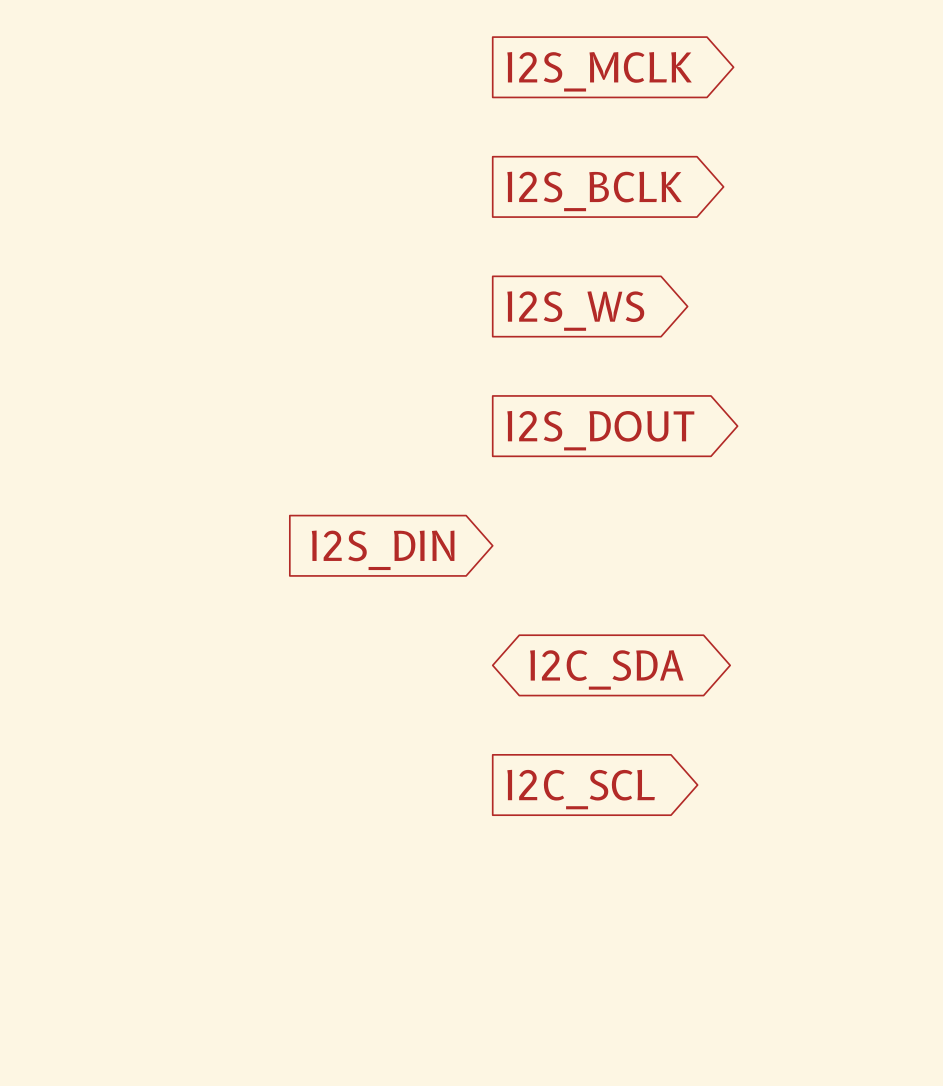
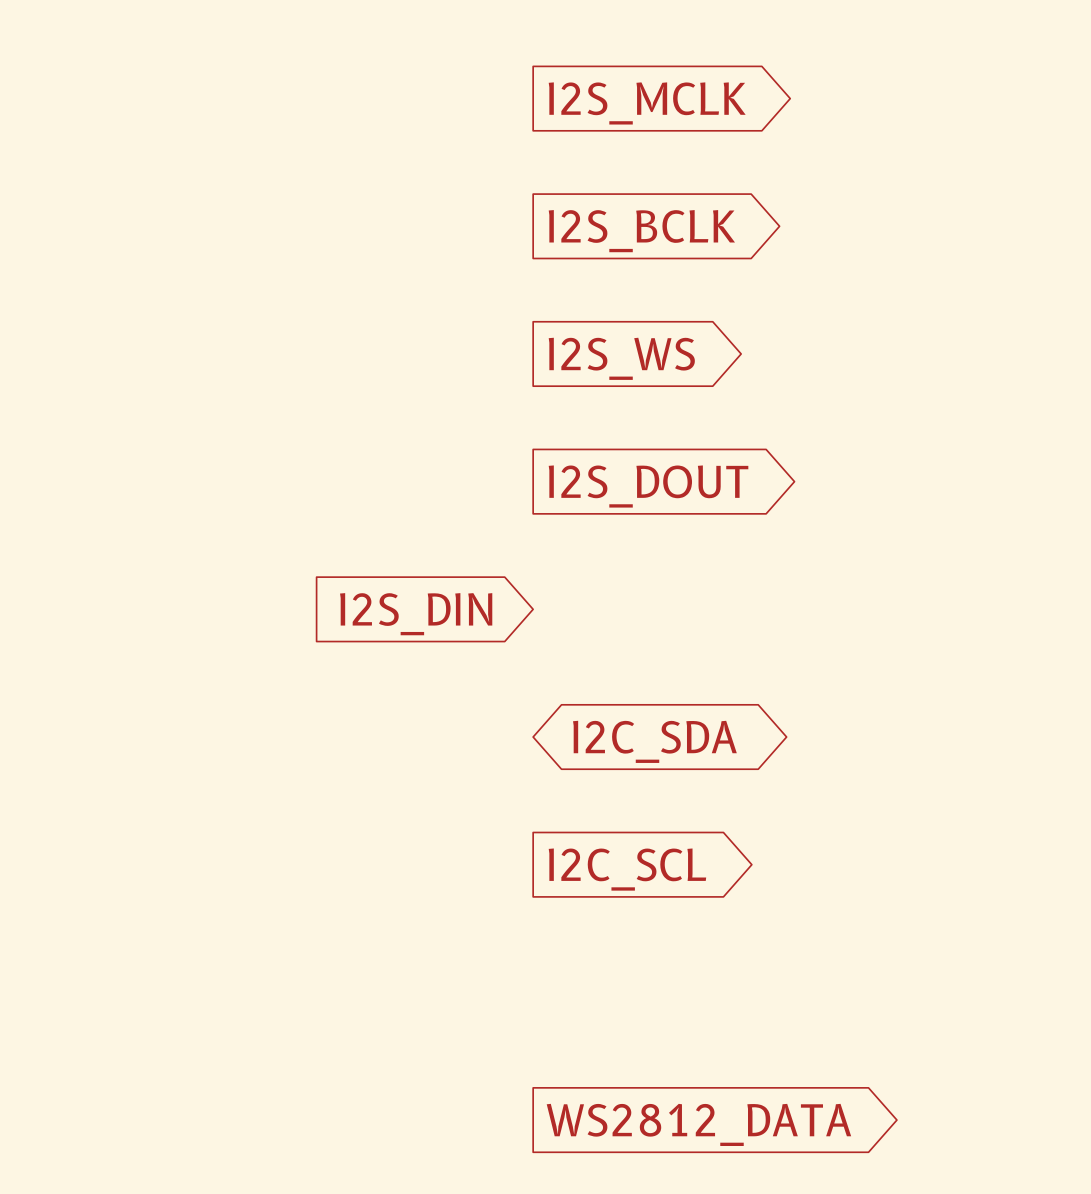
global label: none -> WS2812_DATA (698, 1124)

